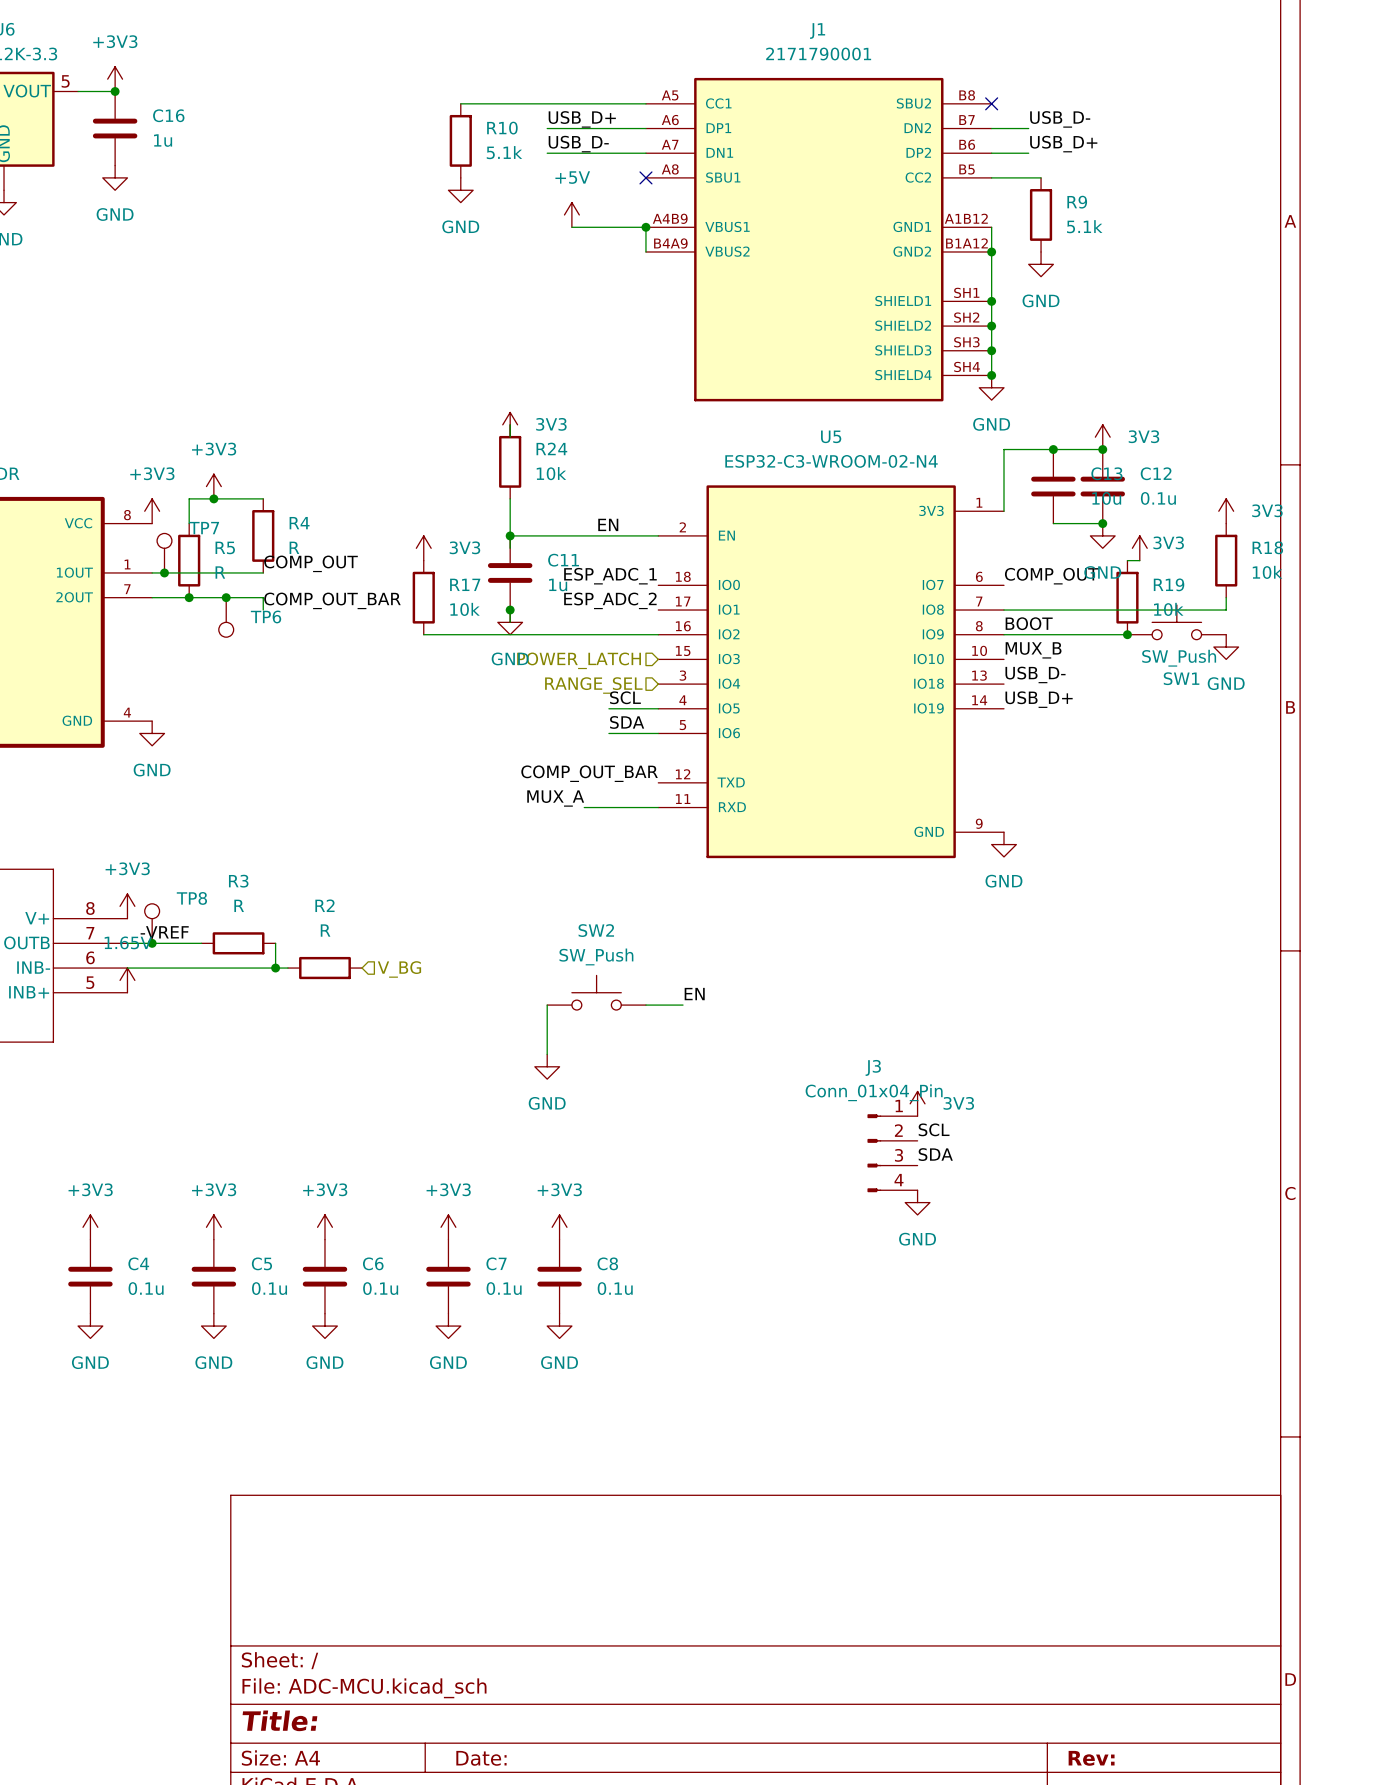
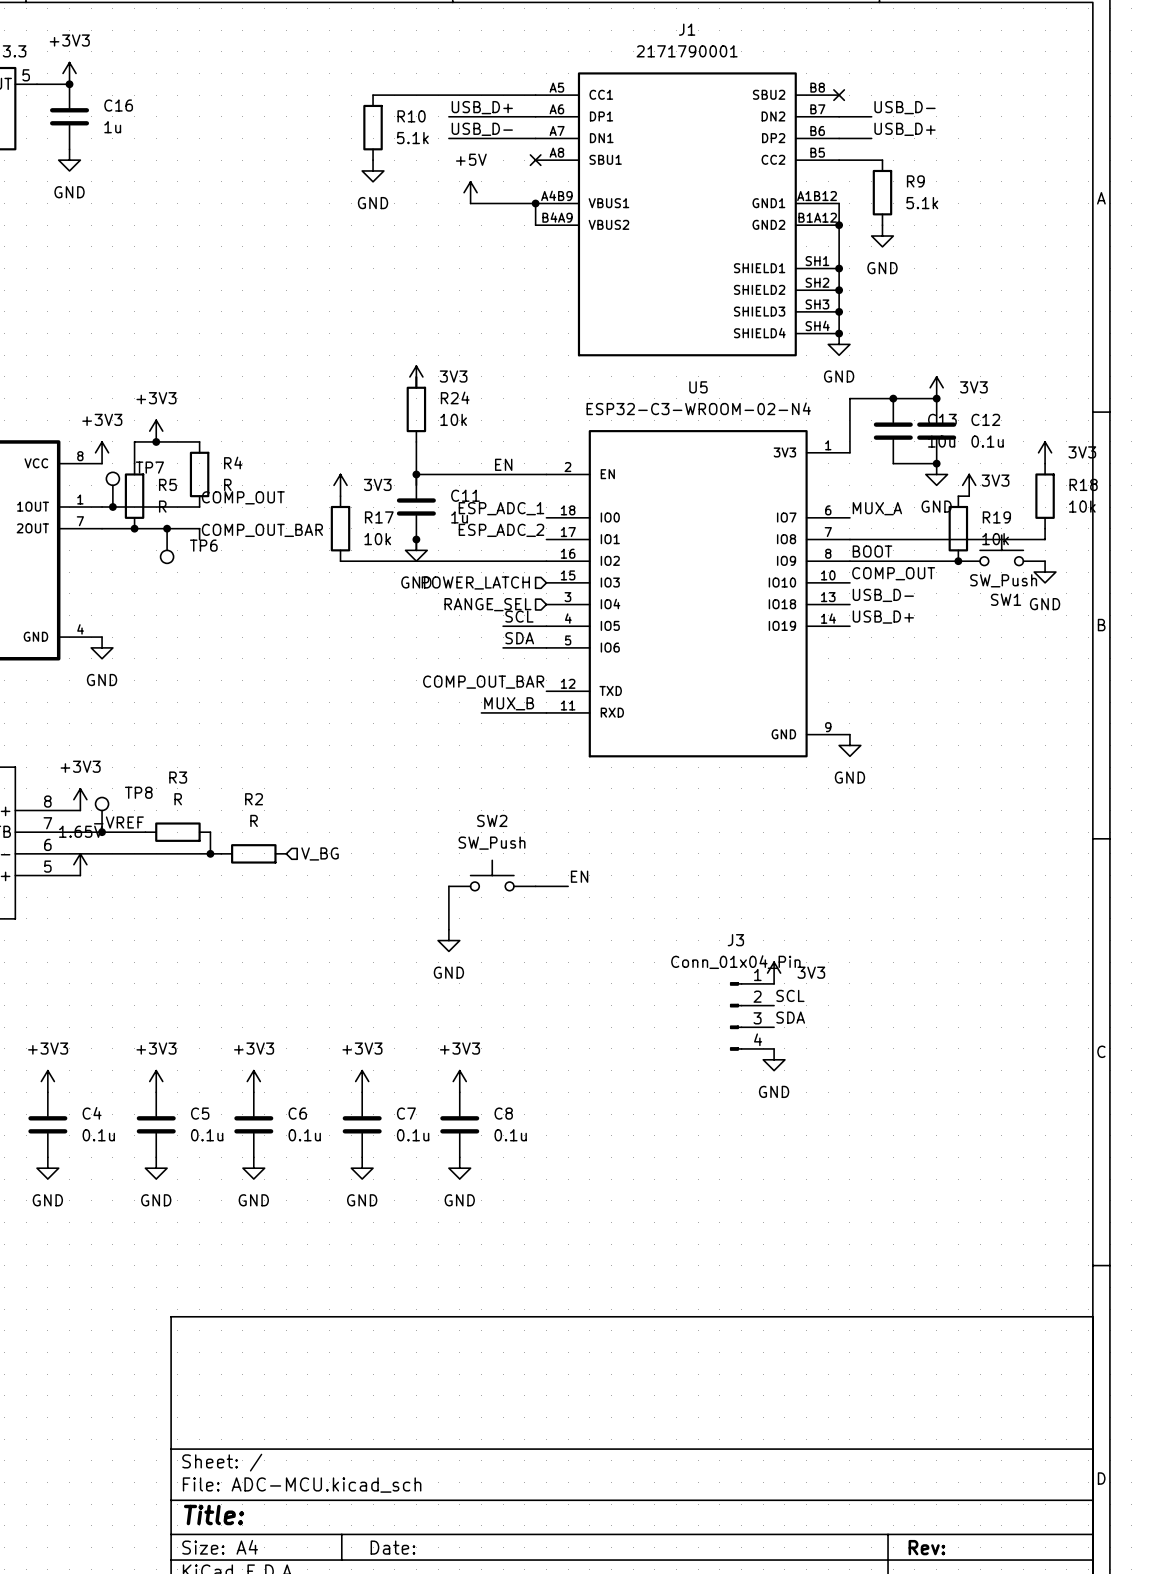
label: COMP_OUT (1051, 576) -> MUX_A (877, 508)
label: MUX_B (1033, 650) -> COMP_OUT (893, 573)
label: MUX_A (555, 798) -> MUX_B (509, 703)

